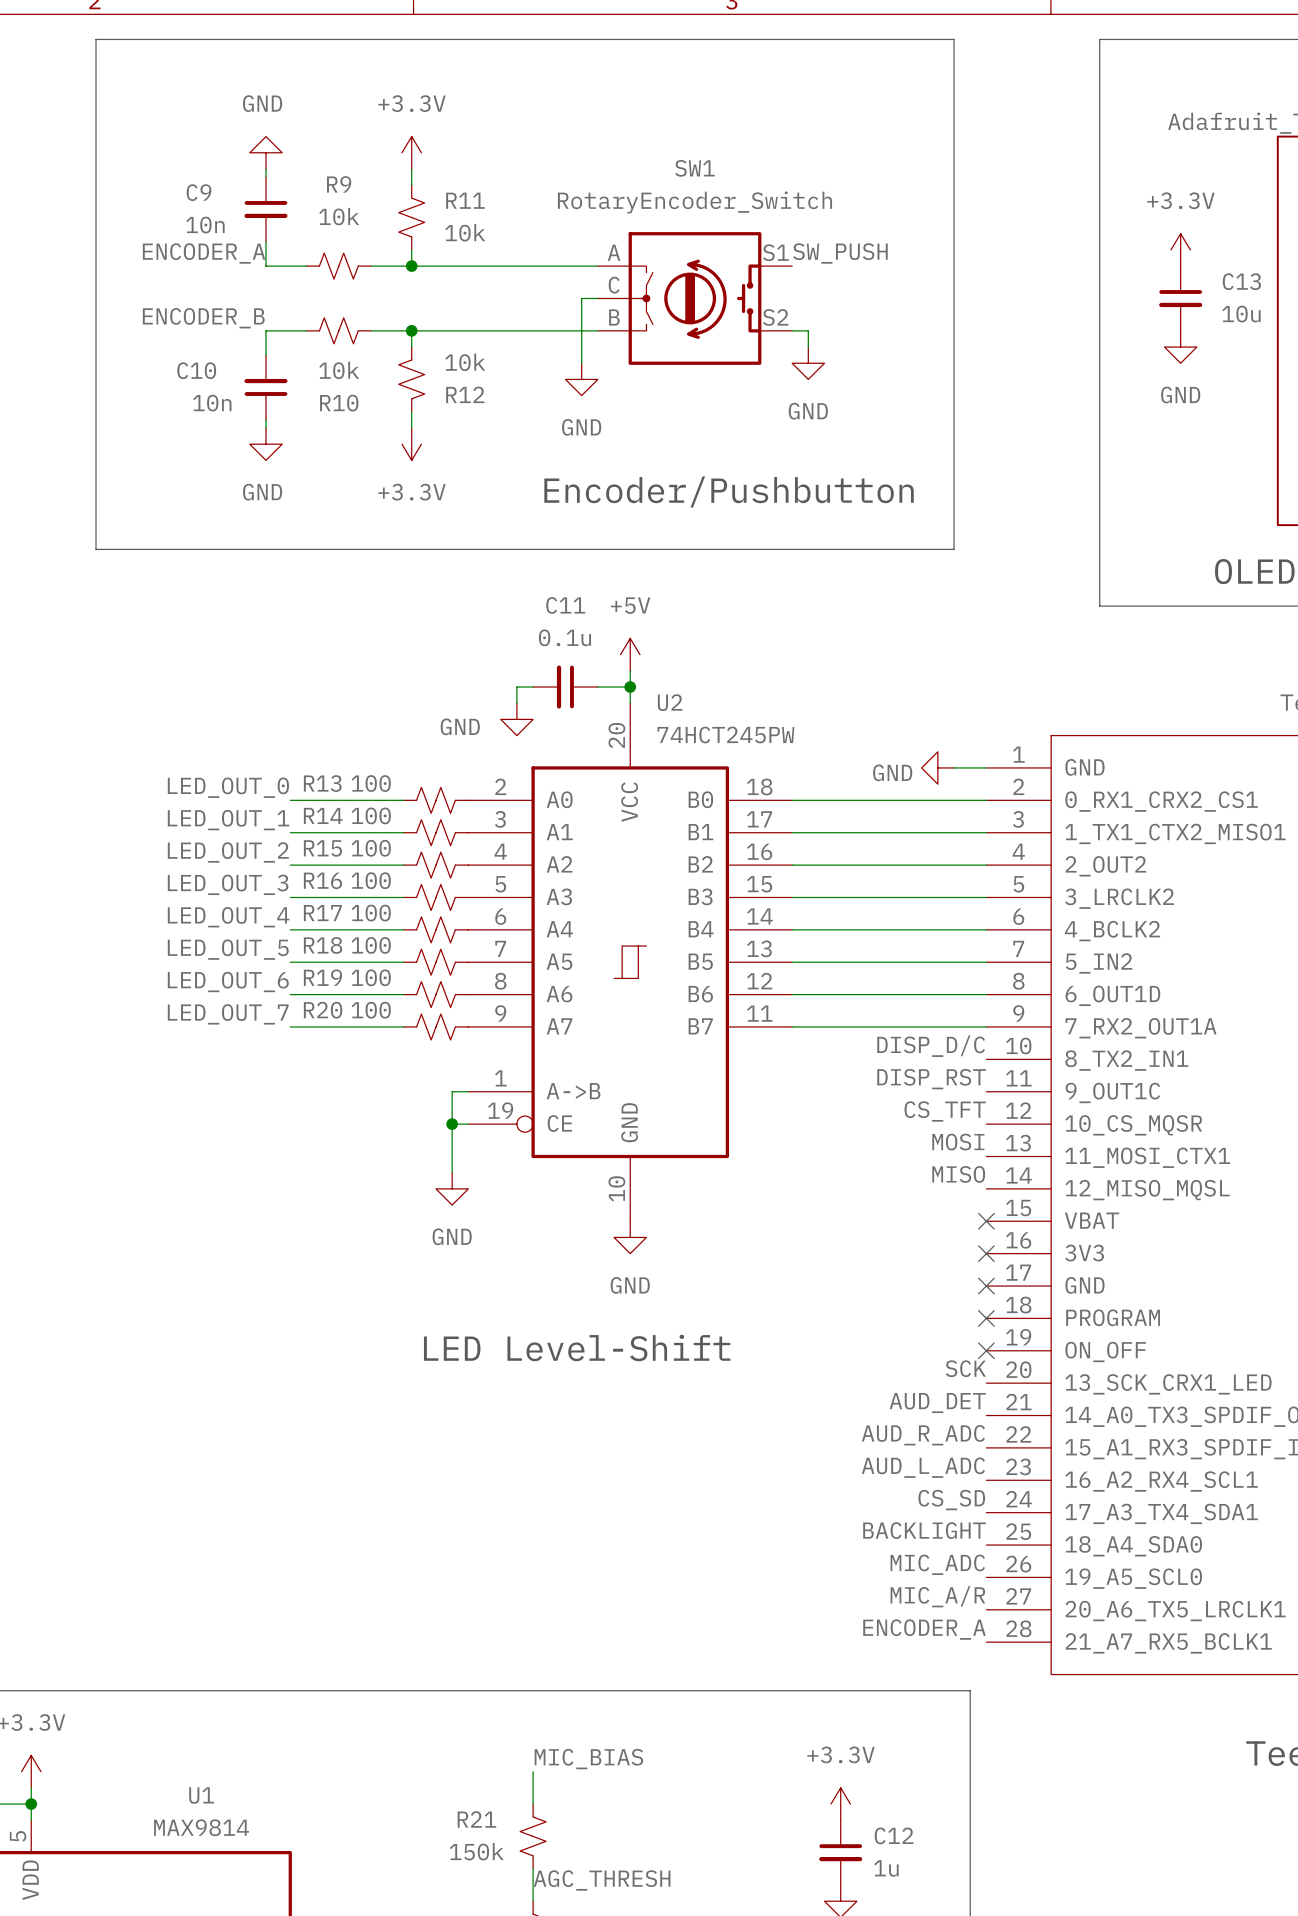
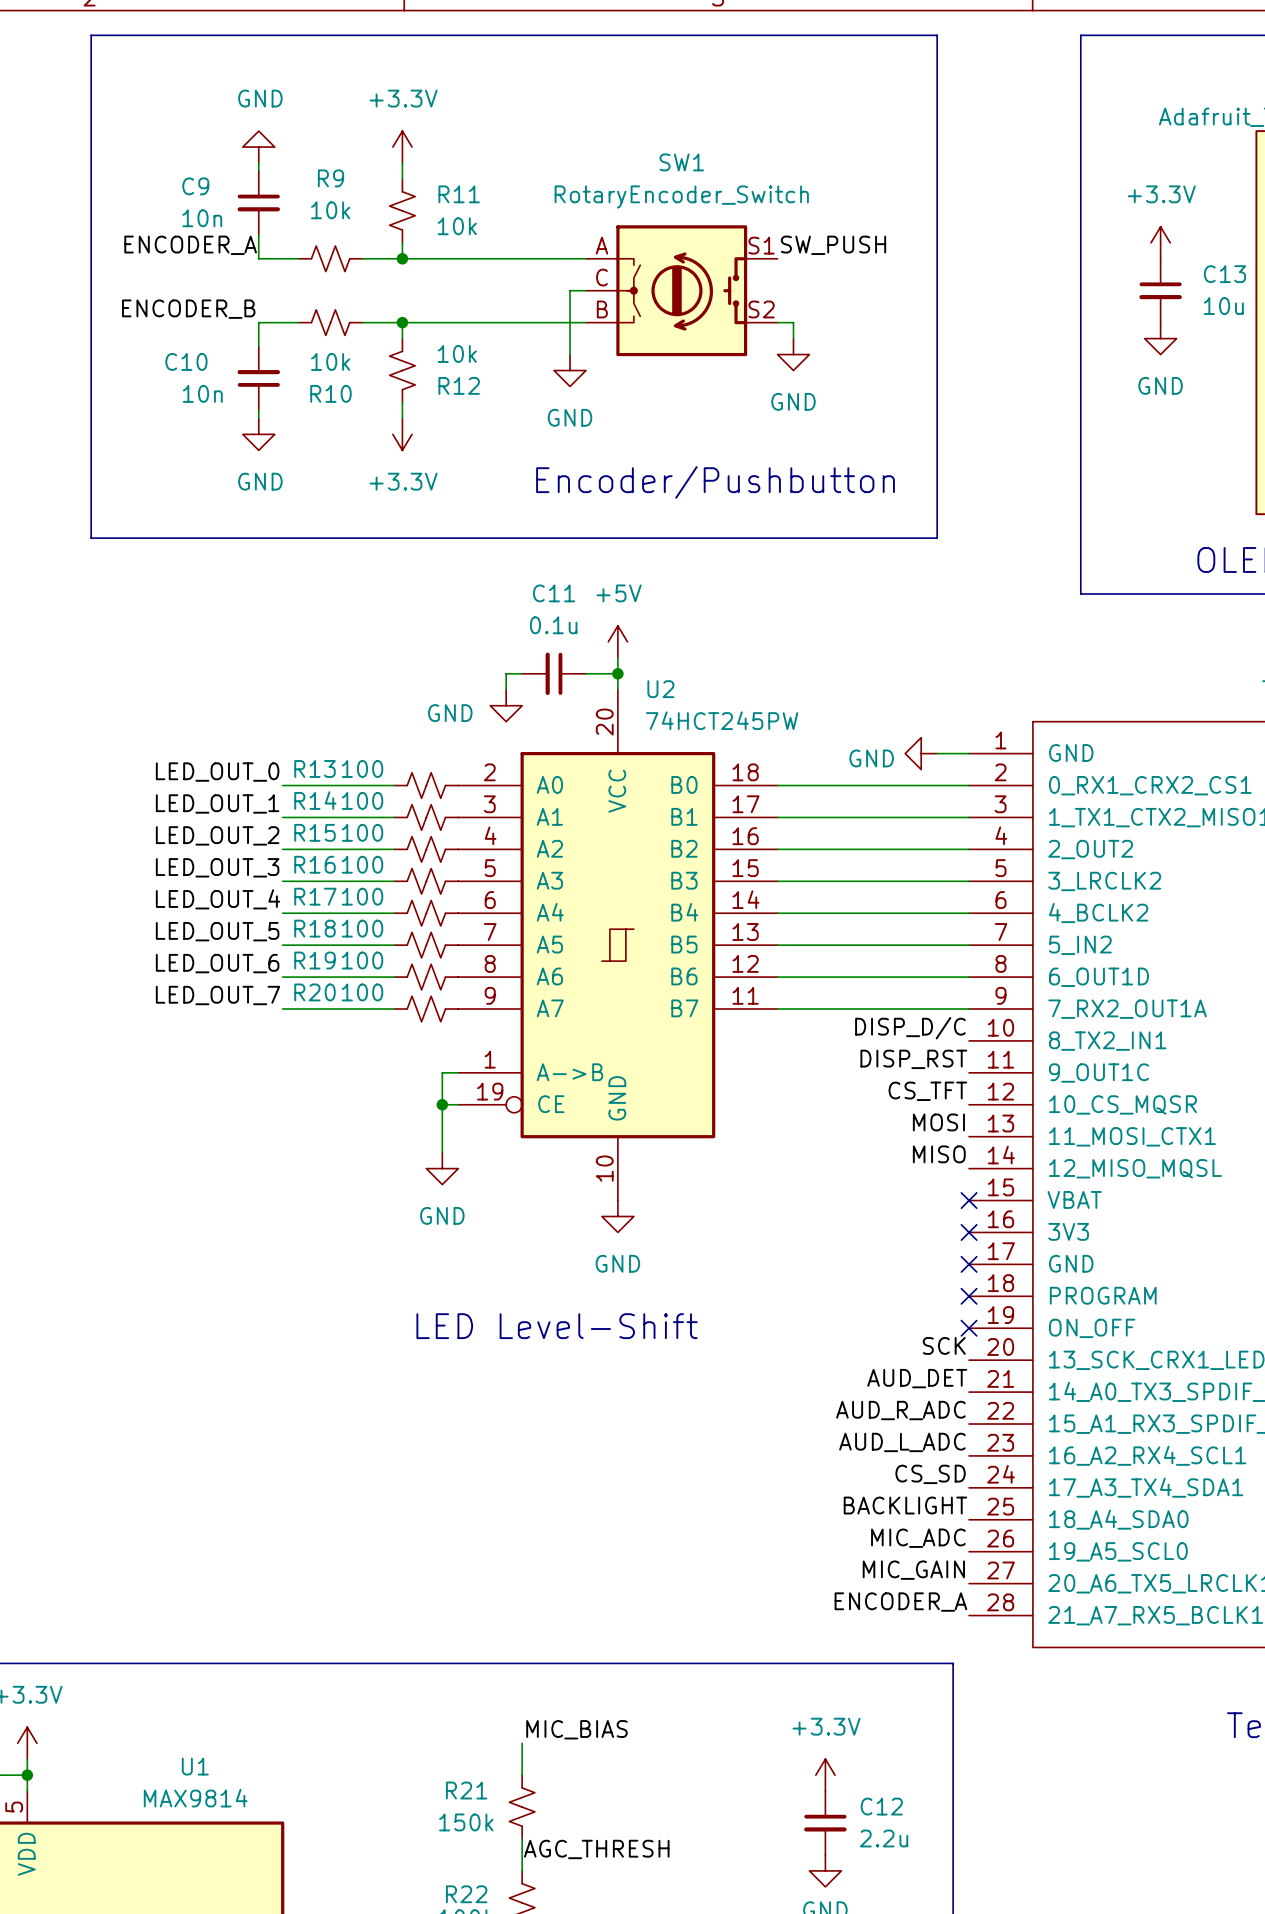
label: MIC_A/R (937, 1596) -> MIC_GAIN (913, 1570)
C12 value: 1u (886, 1868) -> 2.2u (884, 1838)

